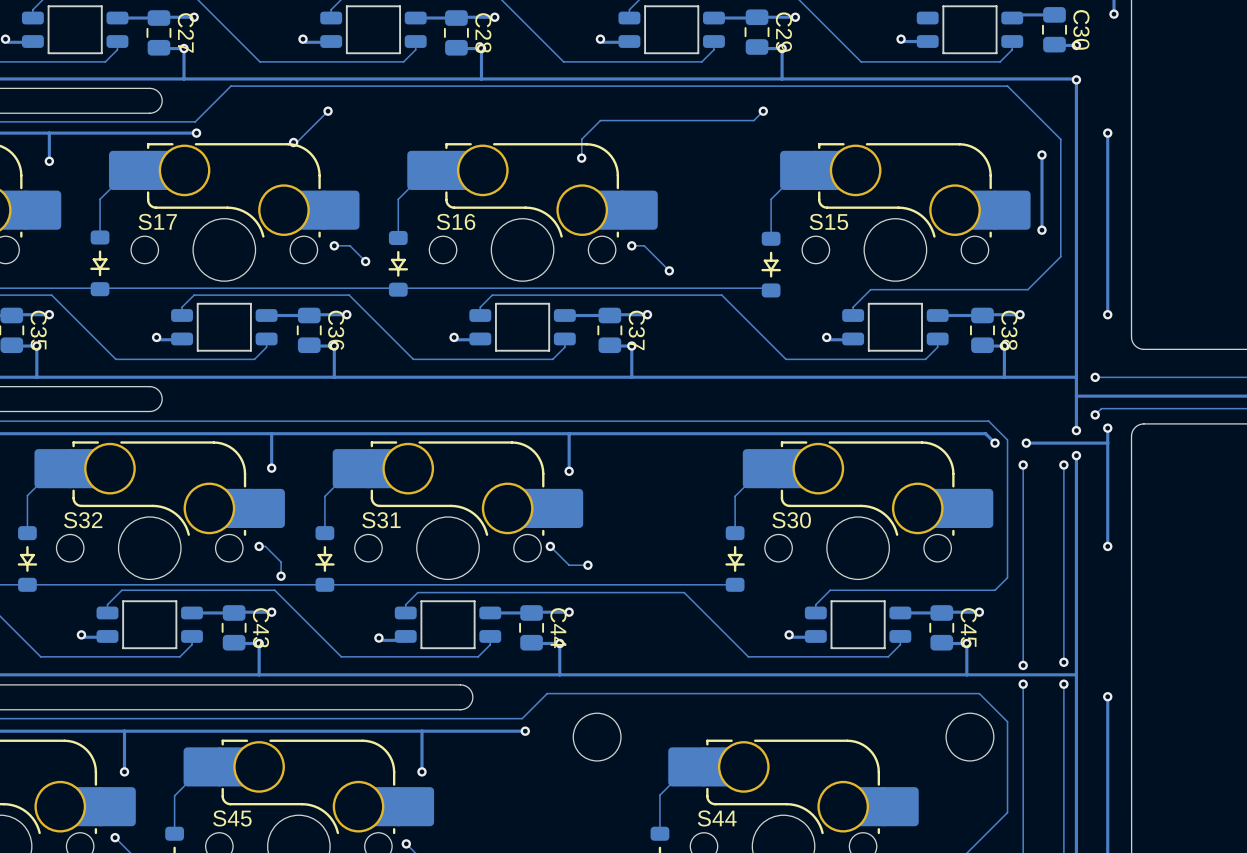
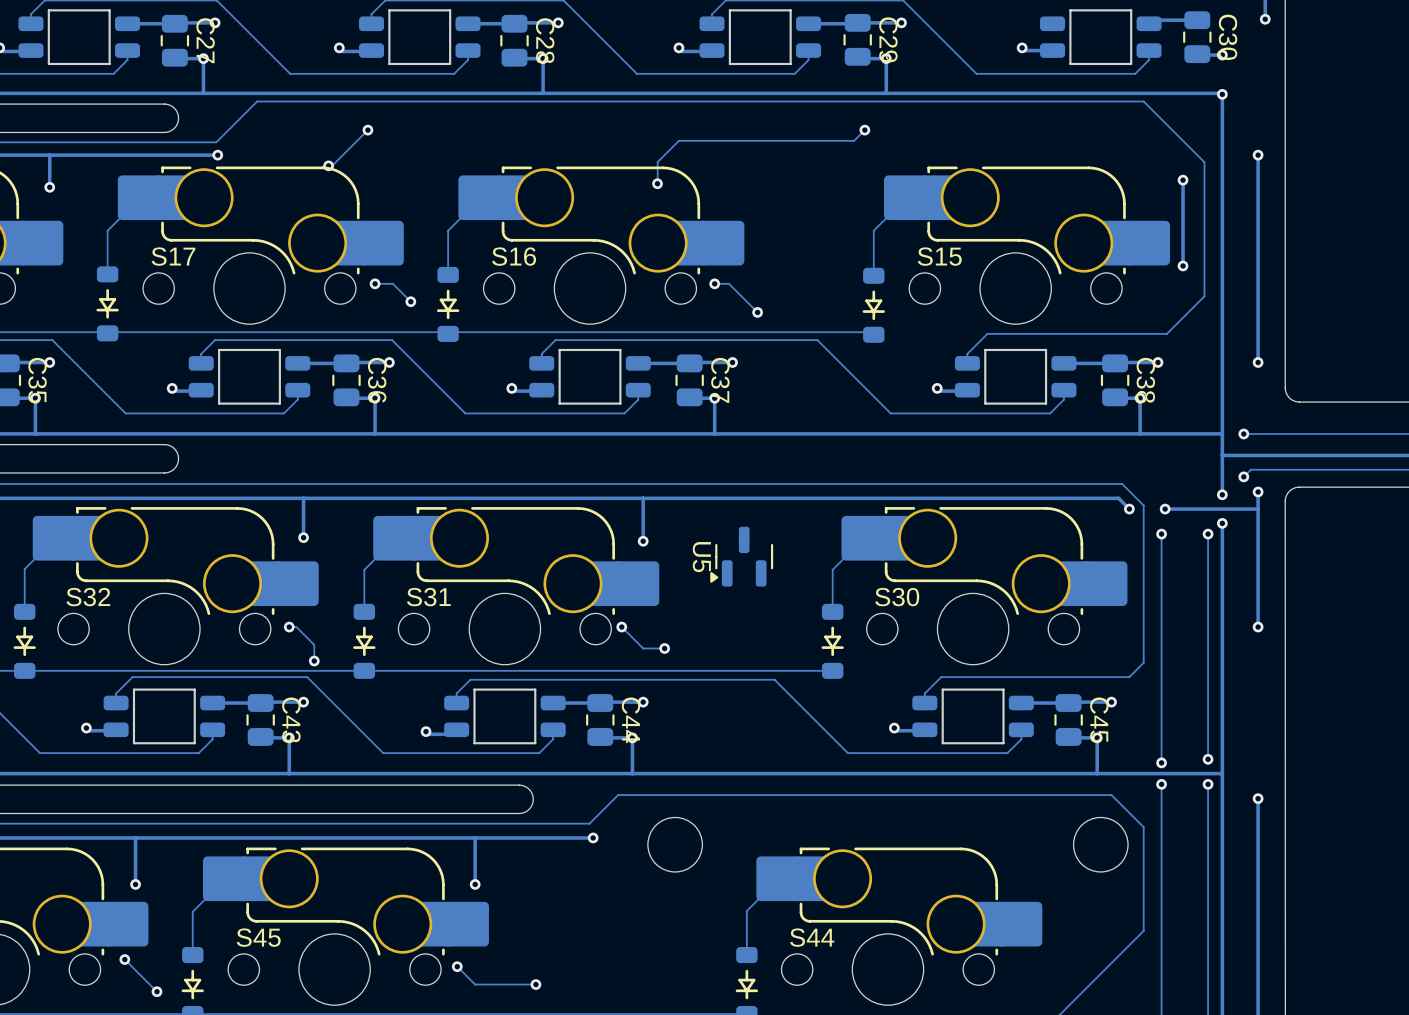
U5: none -> (741, 556)

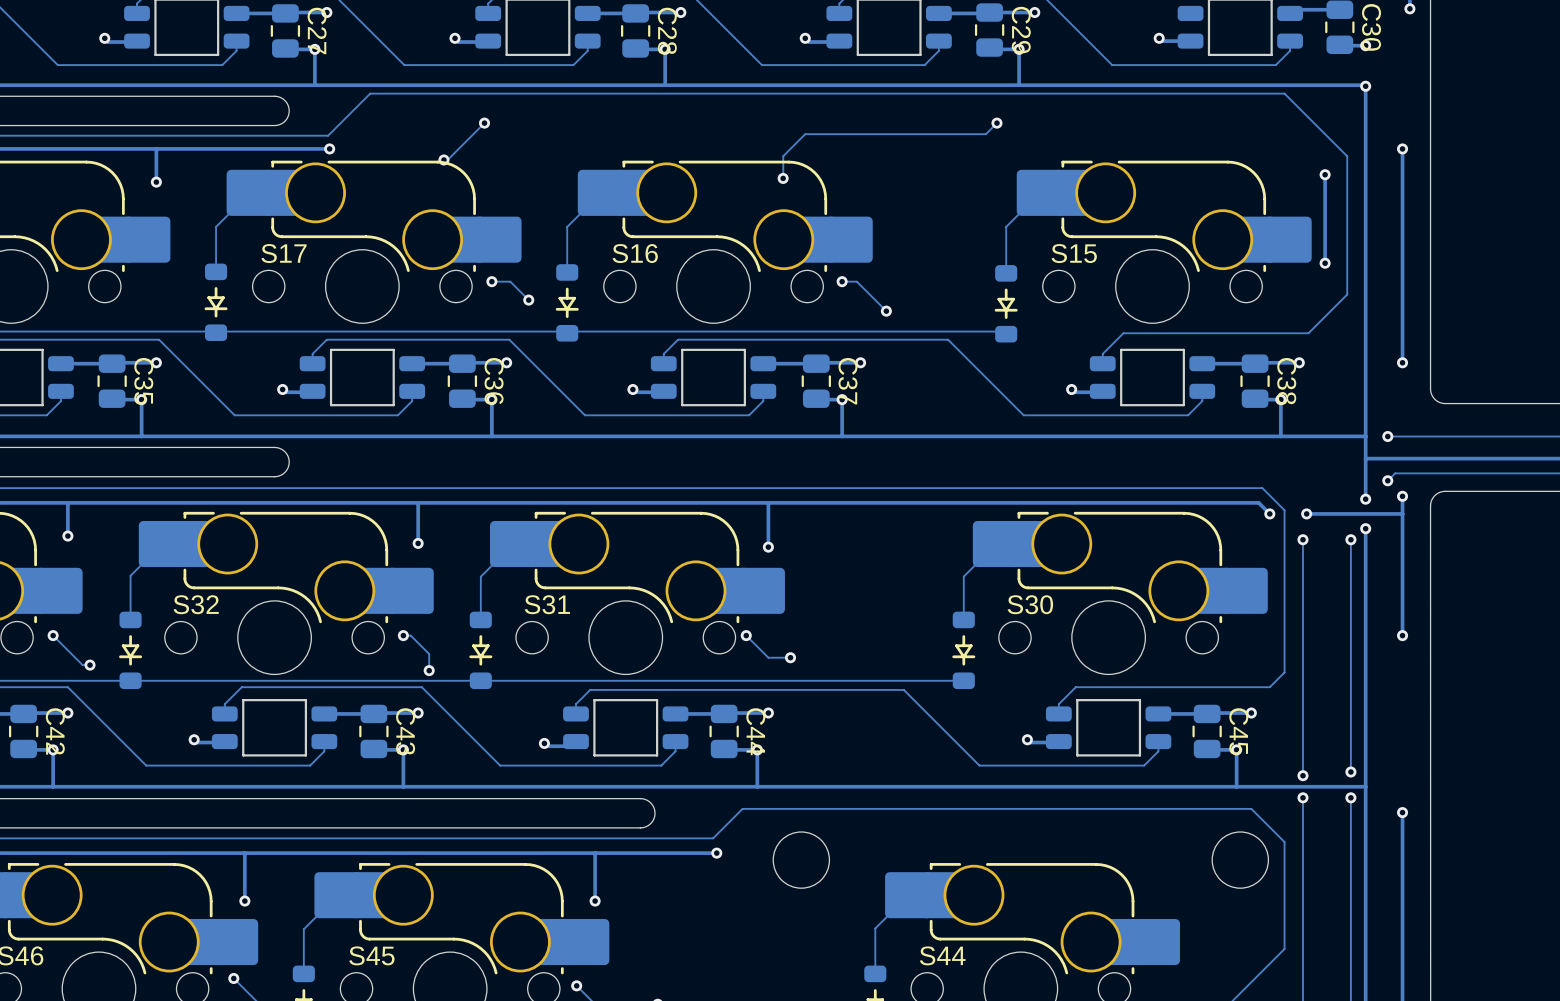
U5: (741, 556) -> none

